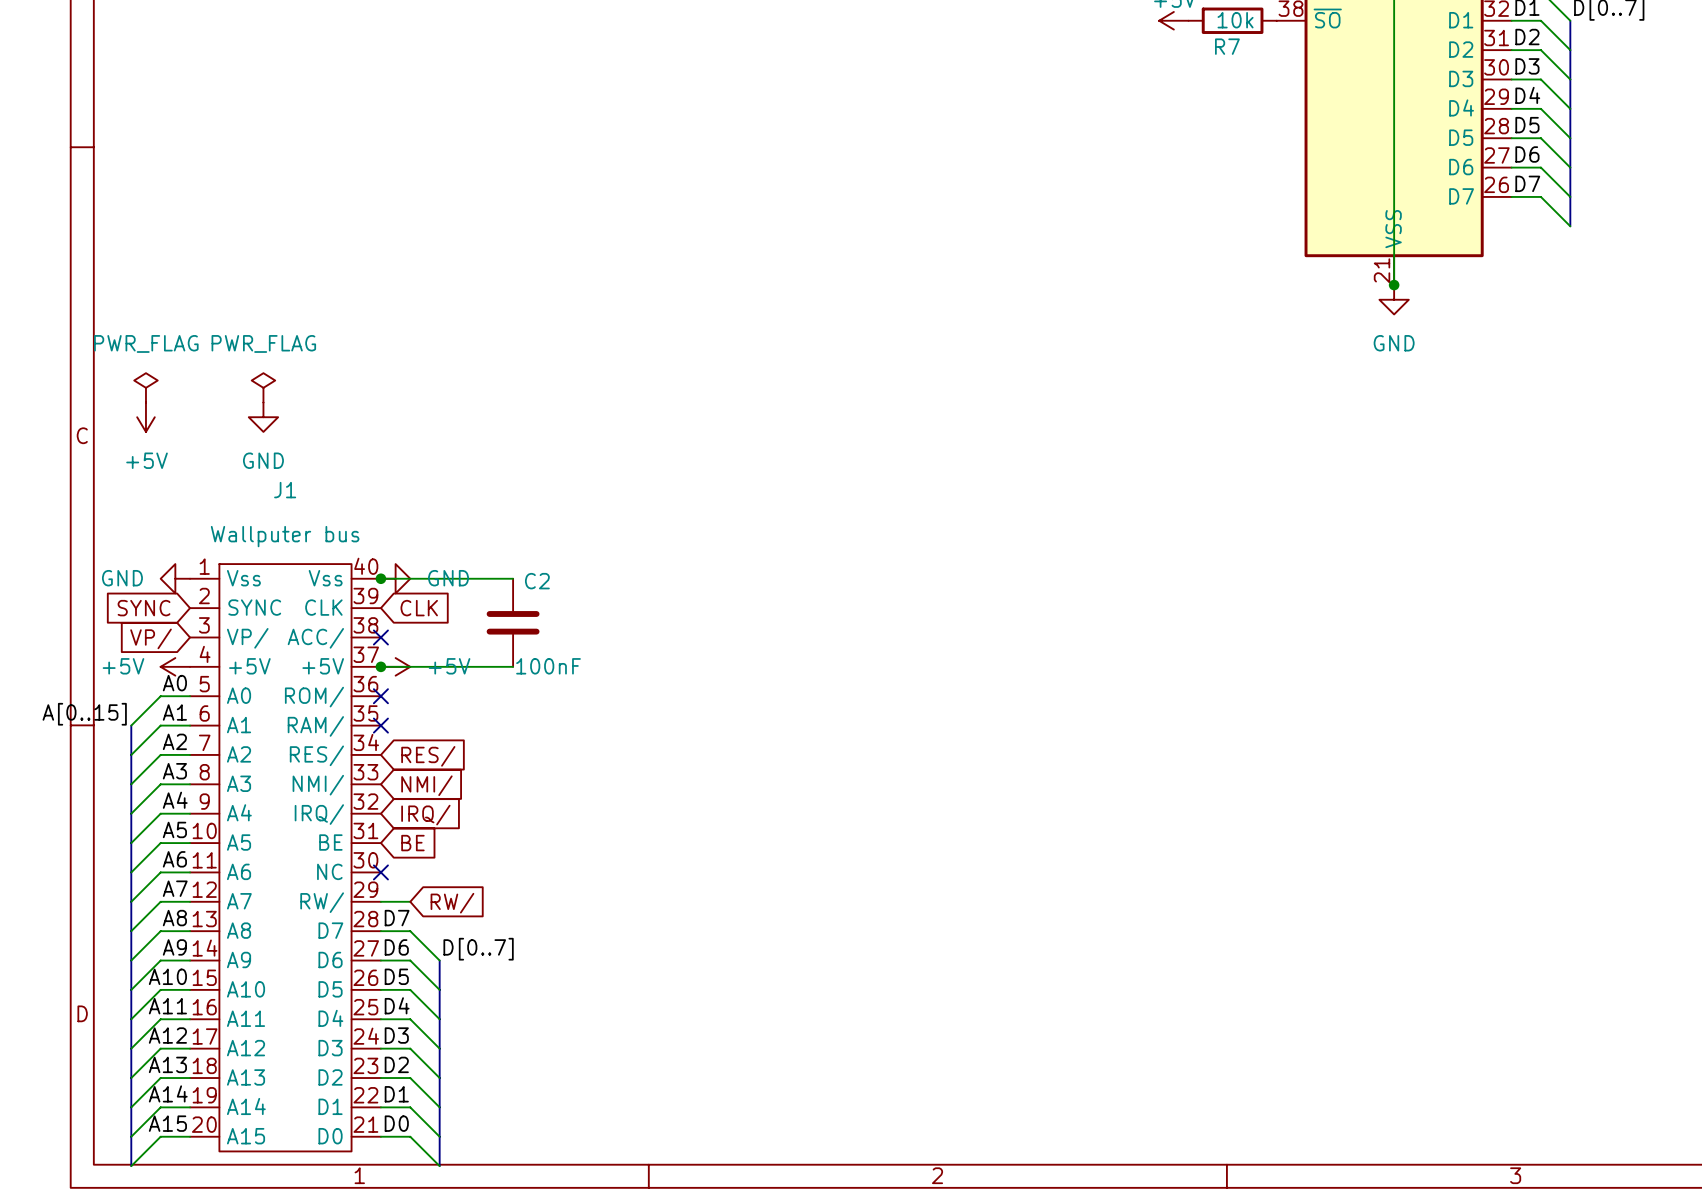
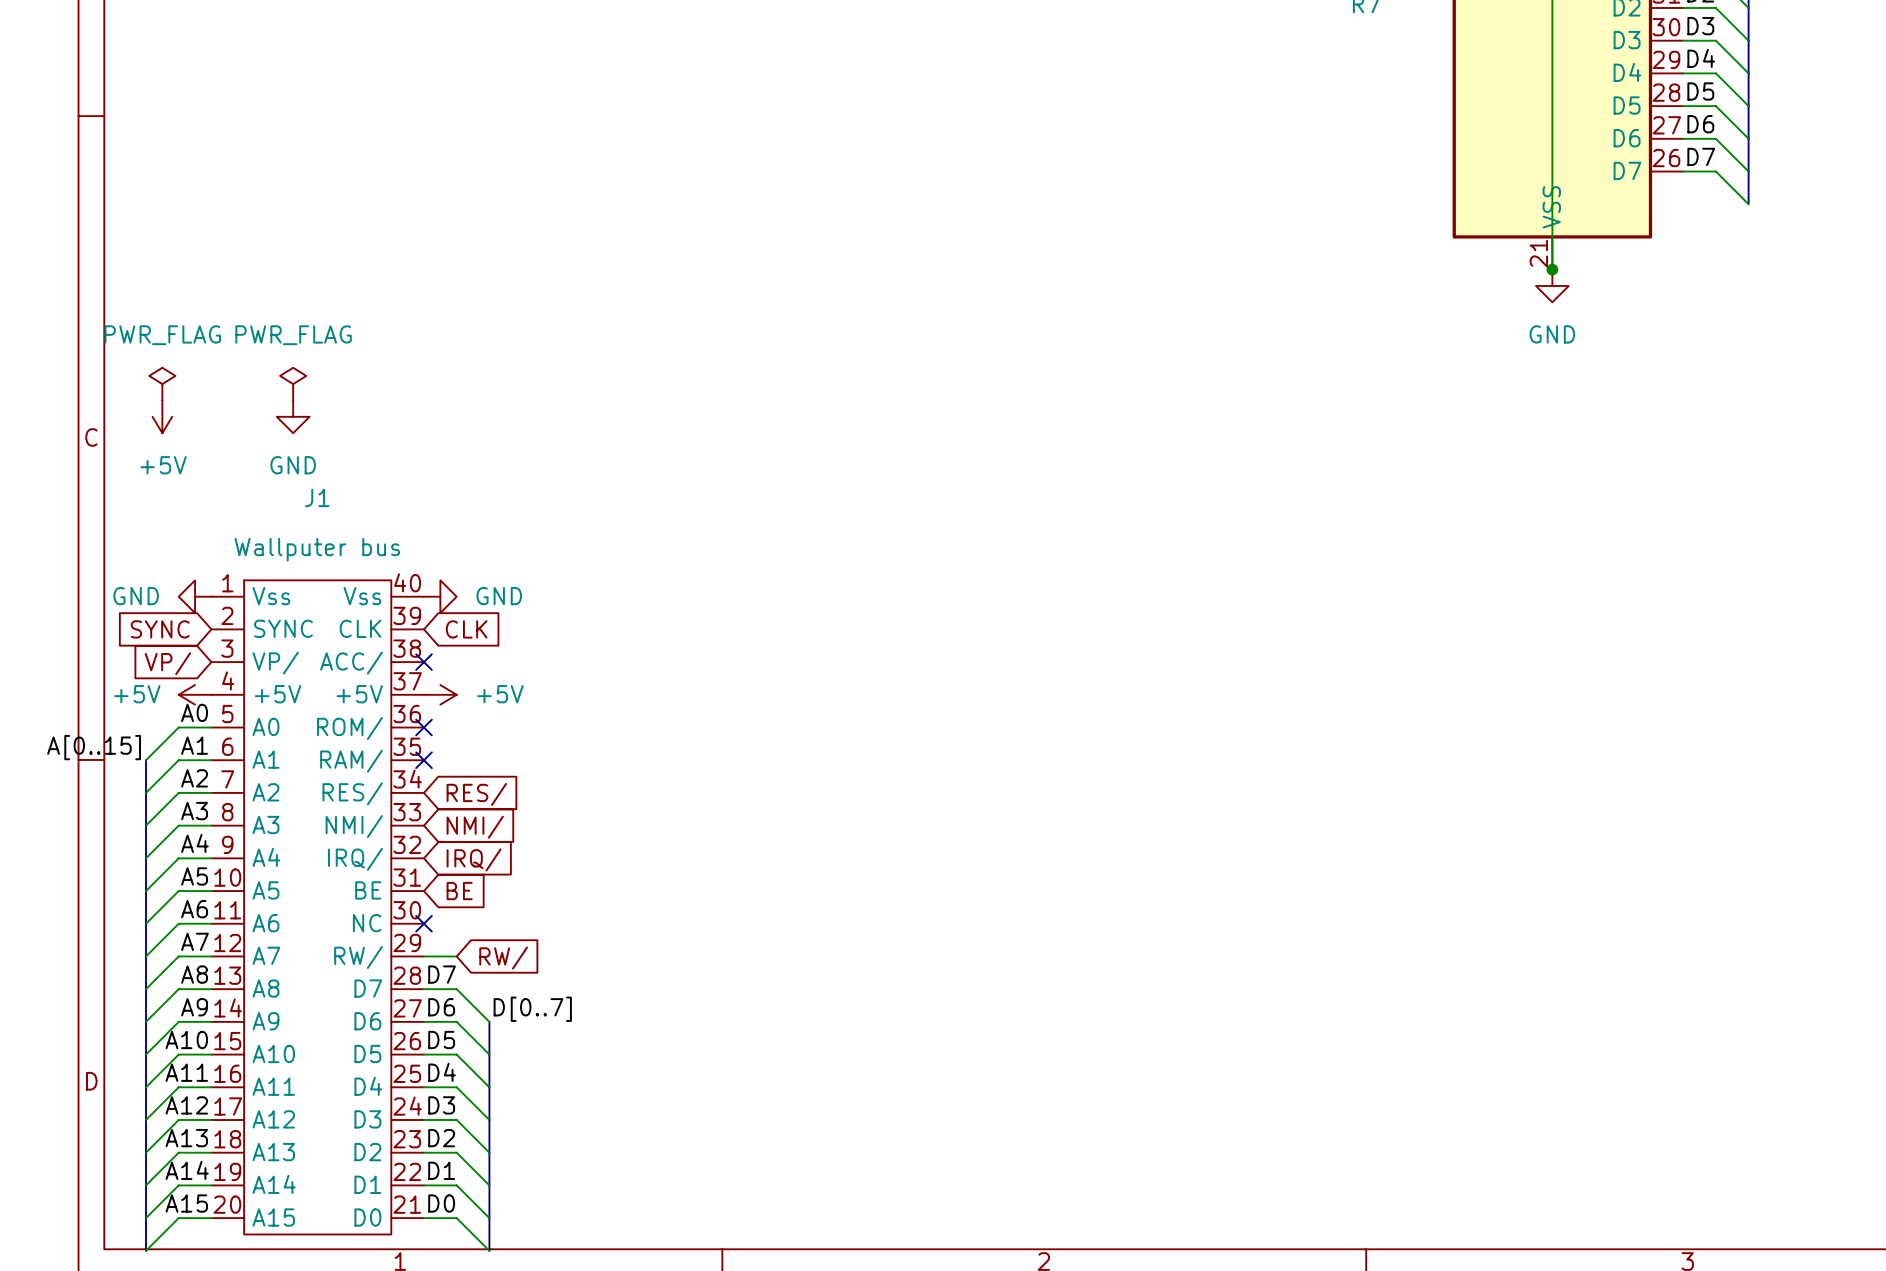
wire: (380, 578) (513, 578) -> none
junction: (380, 578) -> none
C2: 100nF (513, 622) -> none
wire: (380, 666) (513, 666) -> none
junction: (380, 666) -> none

